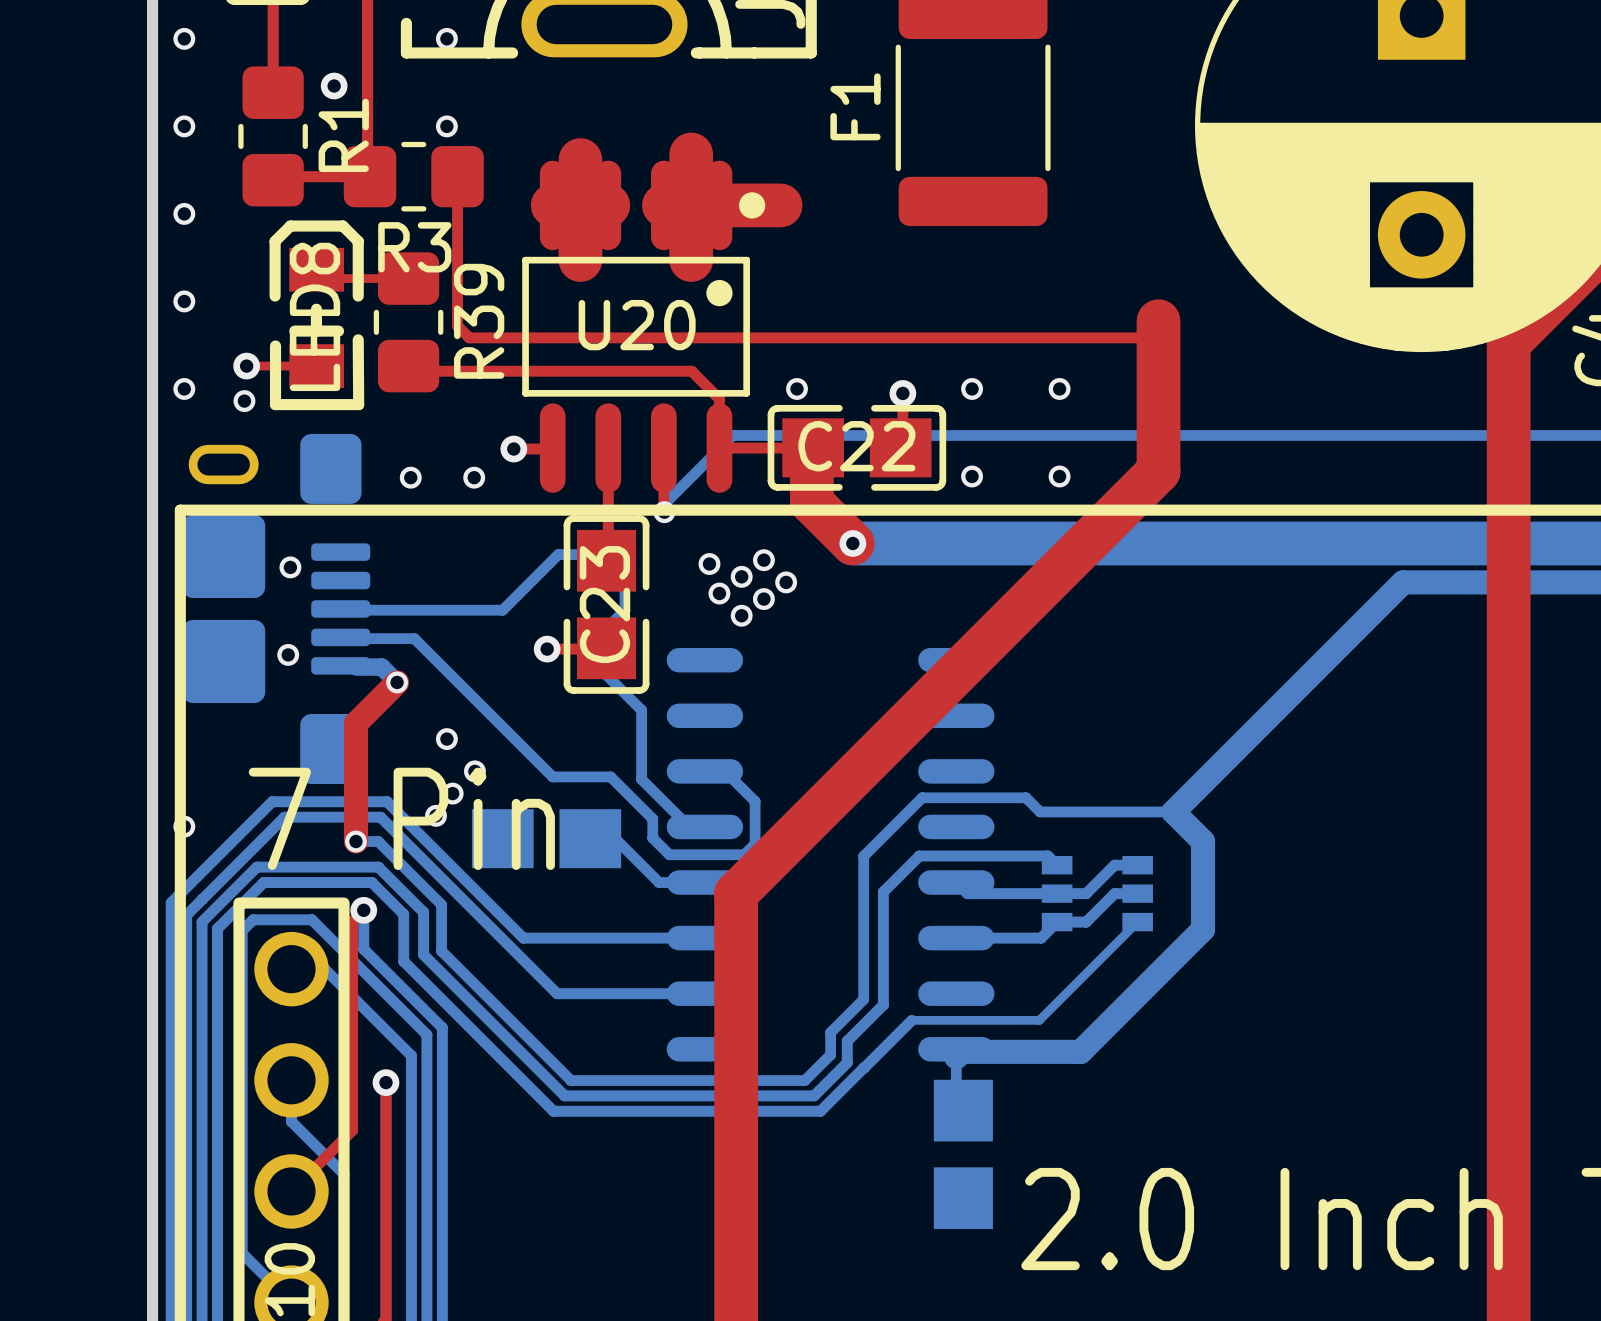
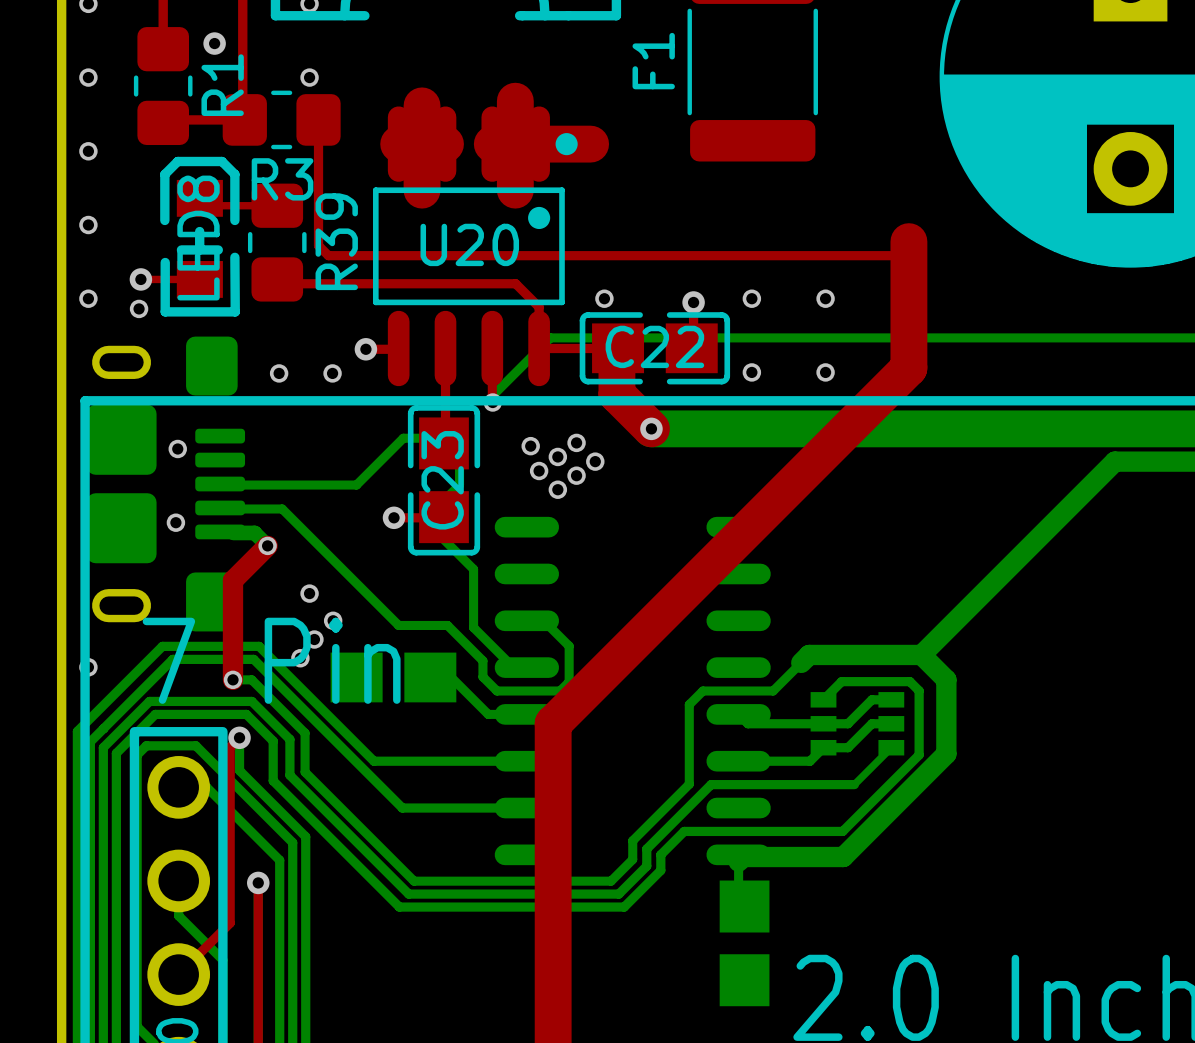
part footprint: [182, 433, 371, 785] -> [86, 336, 246, 632]
bottom track: (1040, 811) (1026, 797) (922, 797) (863, 856) (863, 999) -> (809, 654) (773, 691) (702, 691) (689, 704) (689, 784) (660, 812)
bottom track width: thin (1040, 811) (1173, 811) -> thick (809, 654) (921, 654)
bottom track: (1057, 865) (1047, 856) (919, 856) (883, 892) (883, 1005) (847, 1042) -> (823, 699) (841, 681) (909, 681) (919, 690) (919, 755) (842, 831) (684, 831) (660, 854) (660, 870)
bottom track: (1093, 965) (1039, 1020) (911, 1020) (864, 1067) -> (854, 784) (711, 784) (646, 848)

